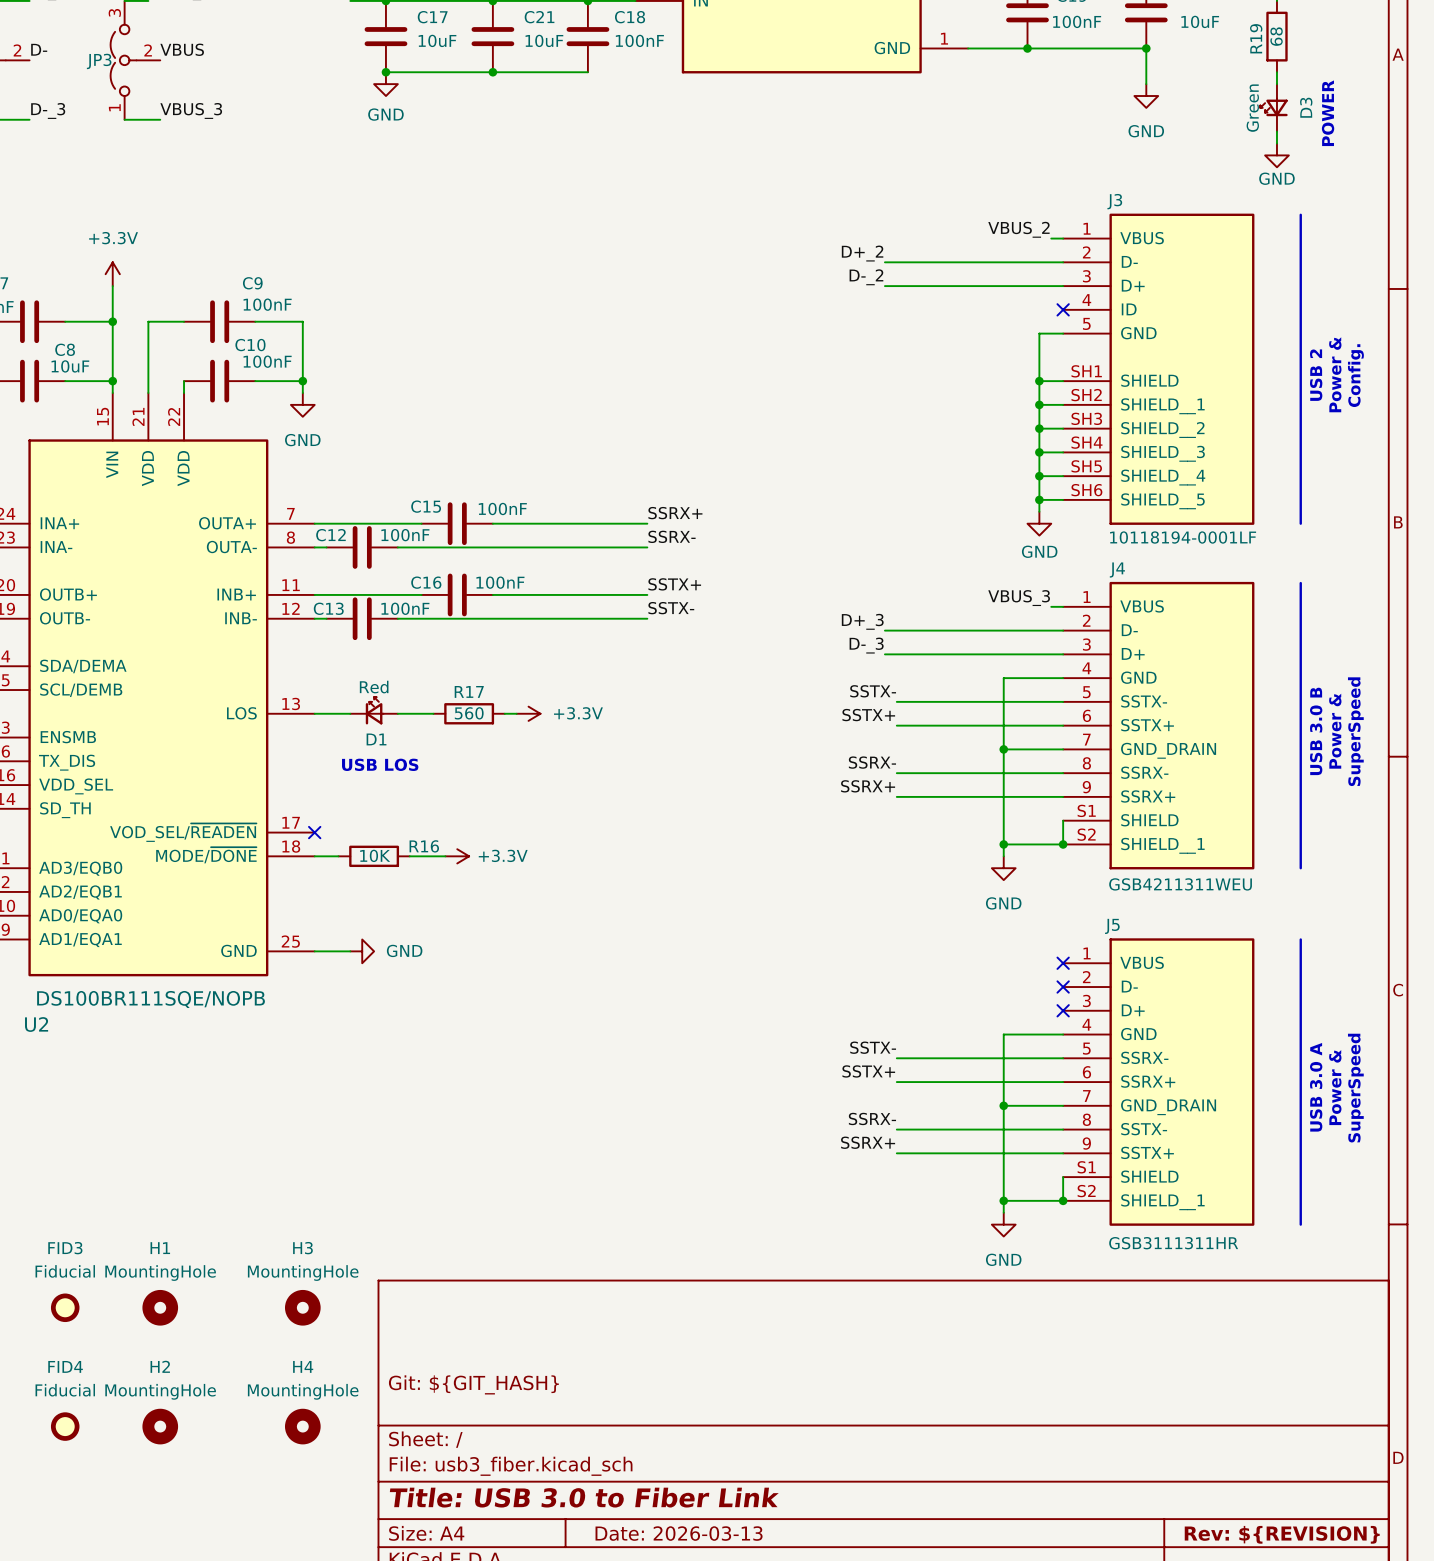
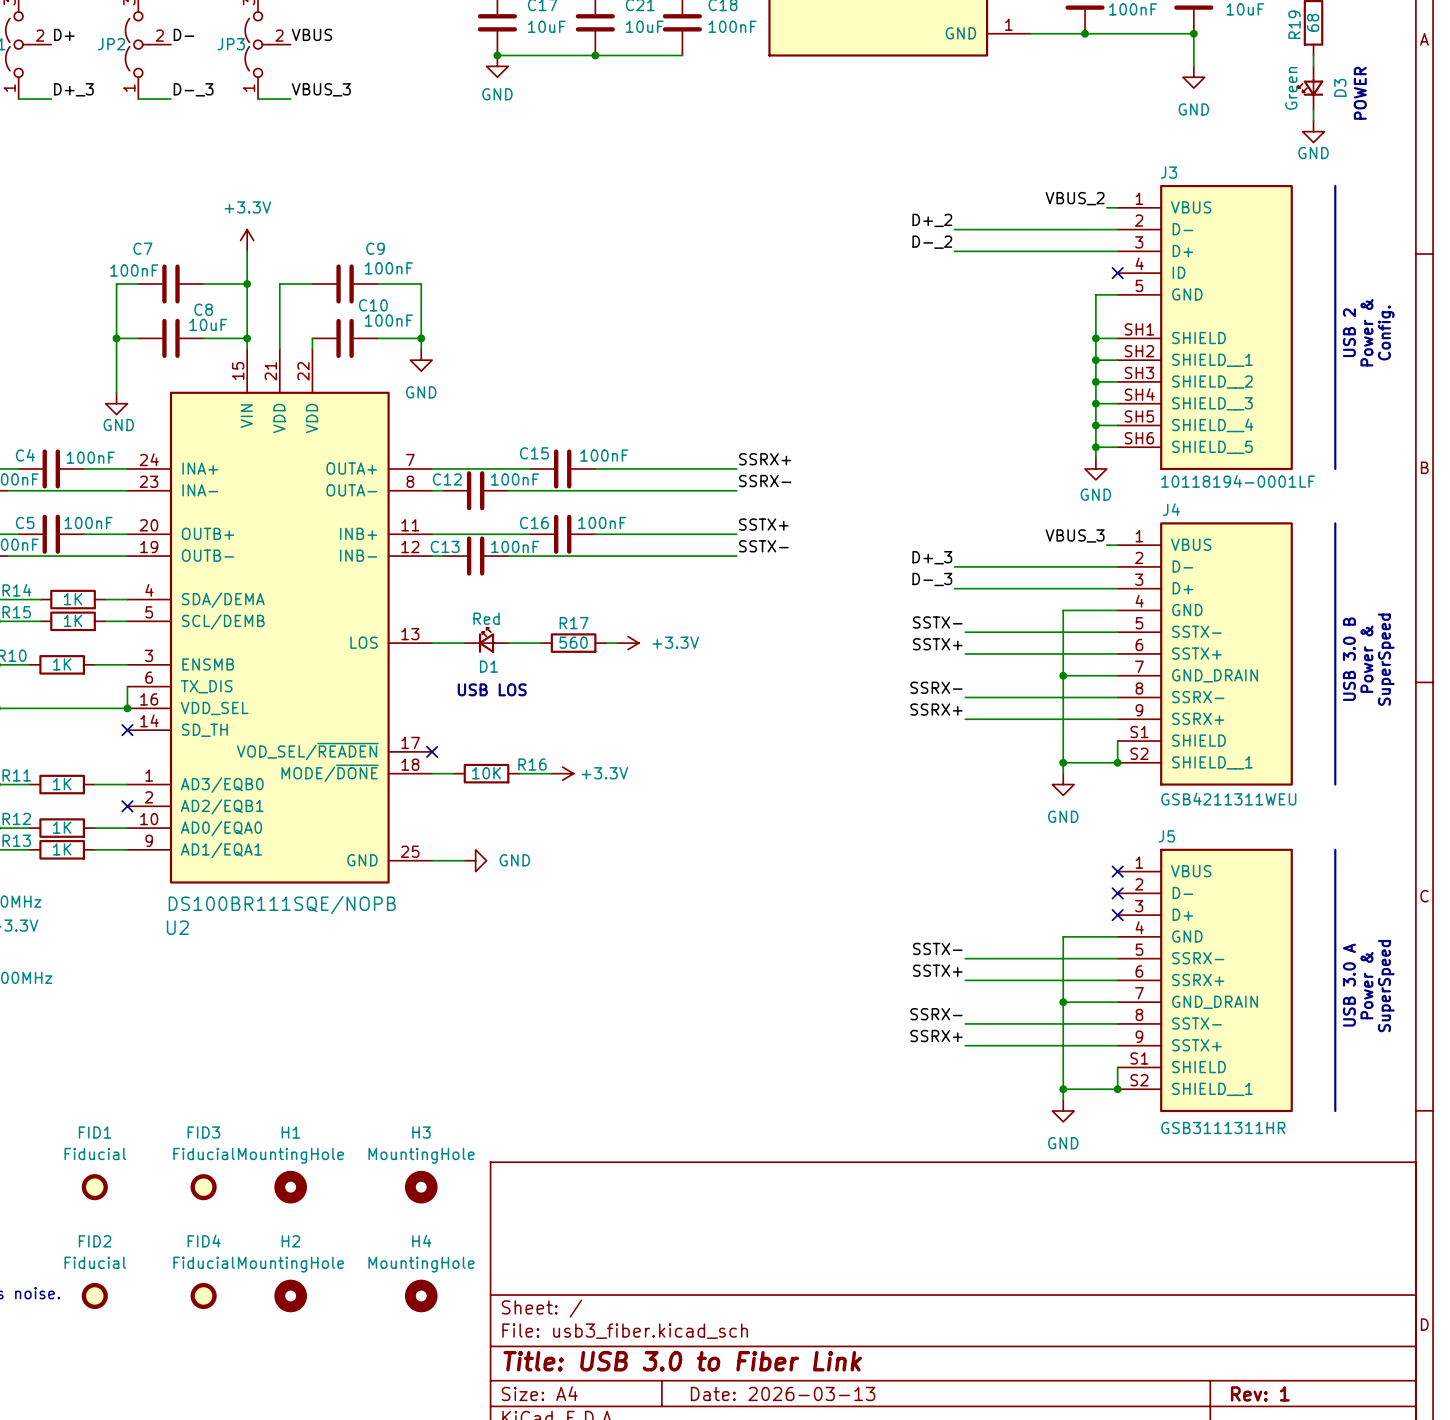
title block: Git: ${GIT_HASH} (473, 1384) -> none
title block: Rev: ${REVISION} (1282, 1534) -> Rev: 1 (1260, 1393)

